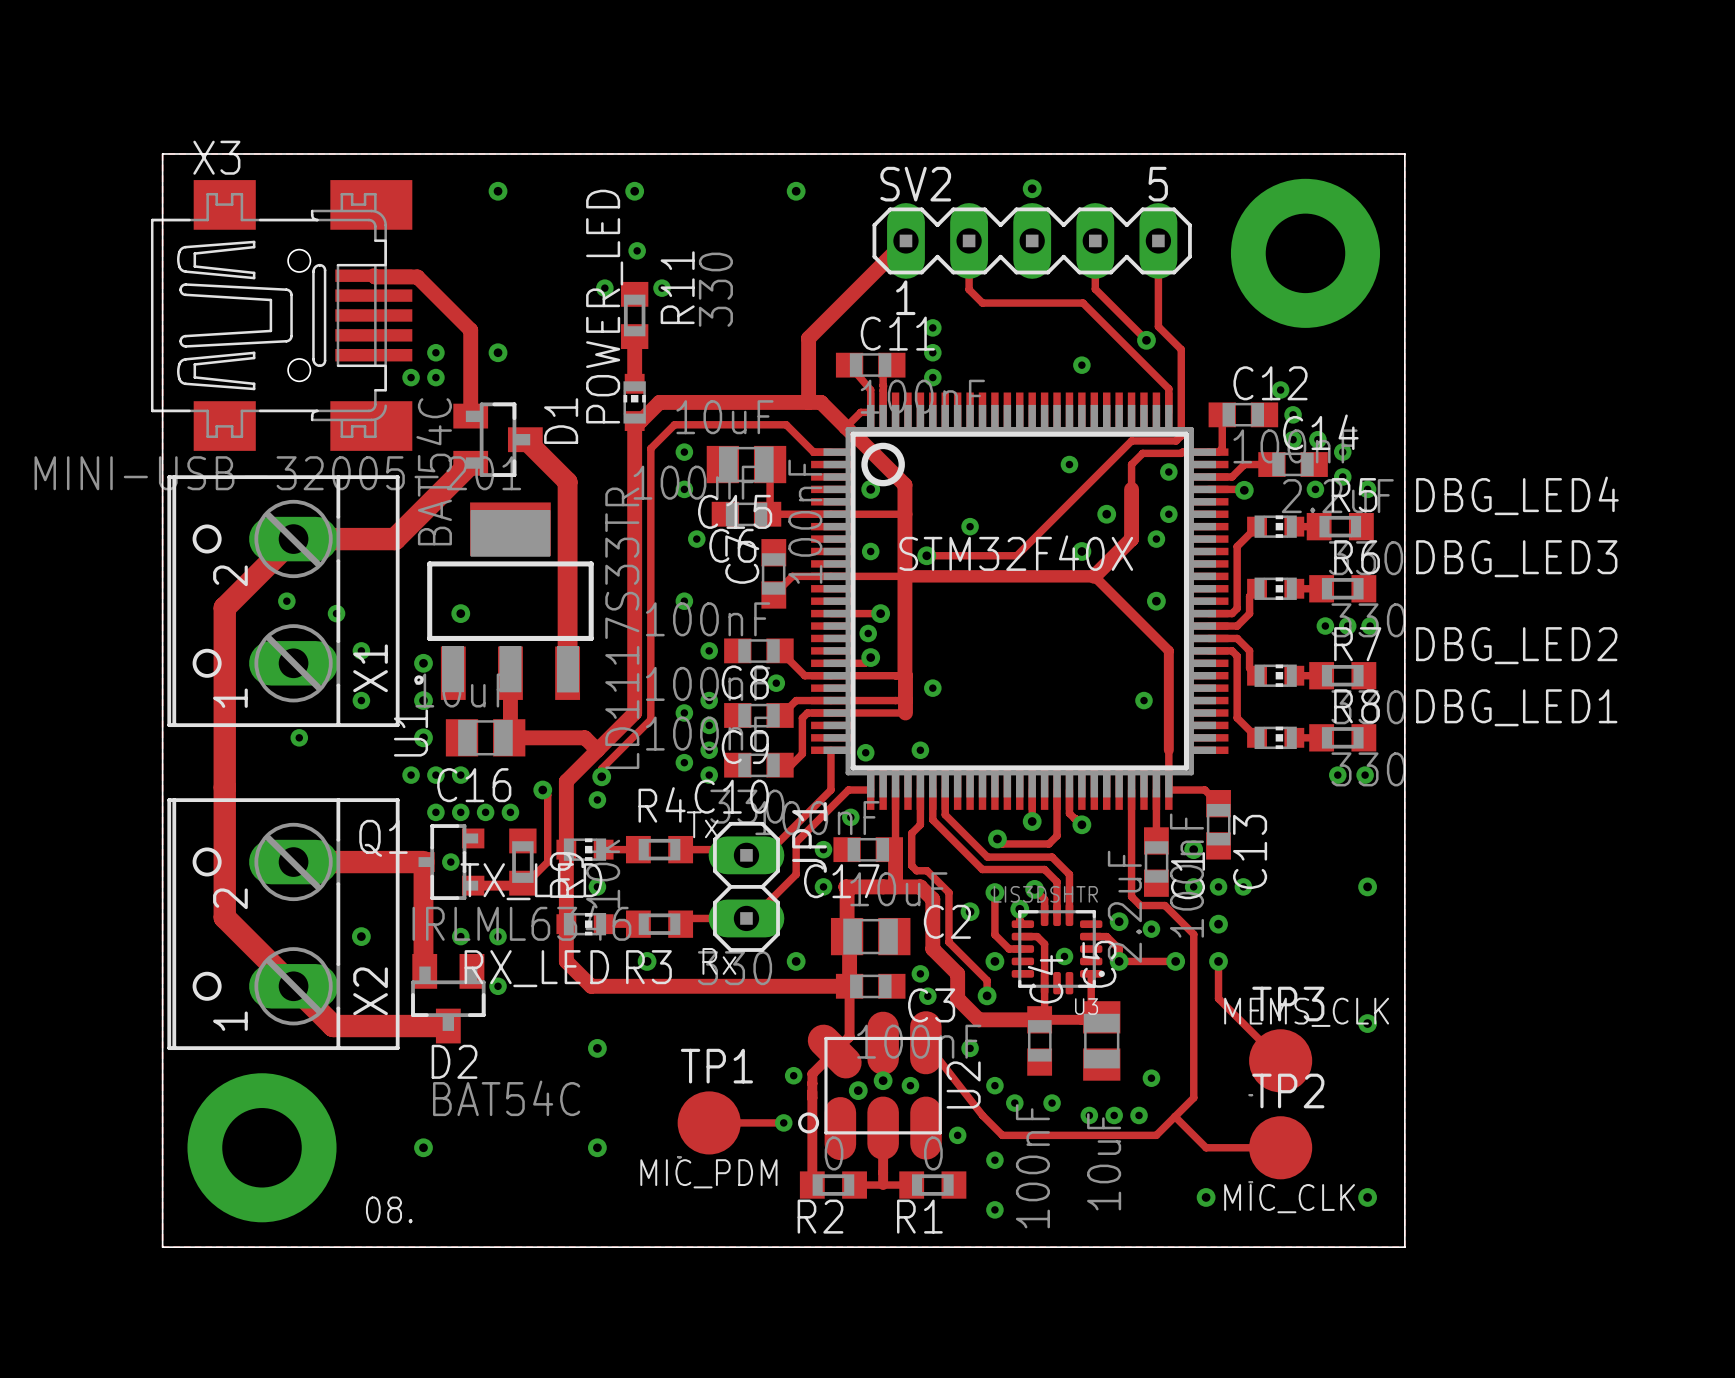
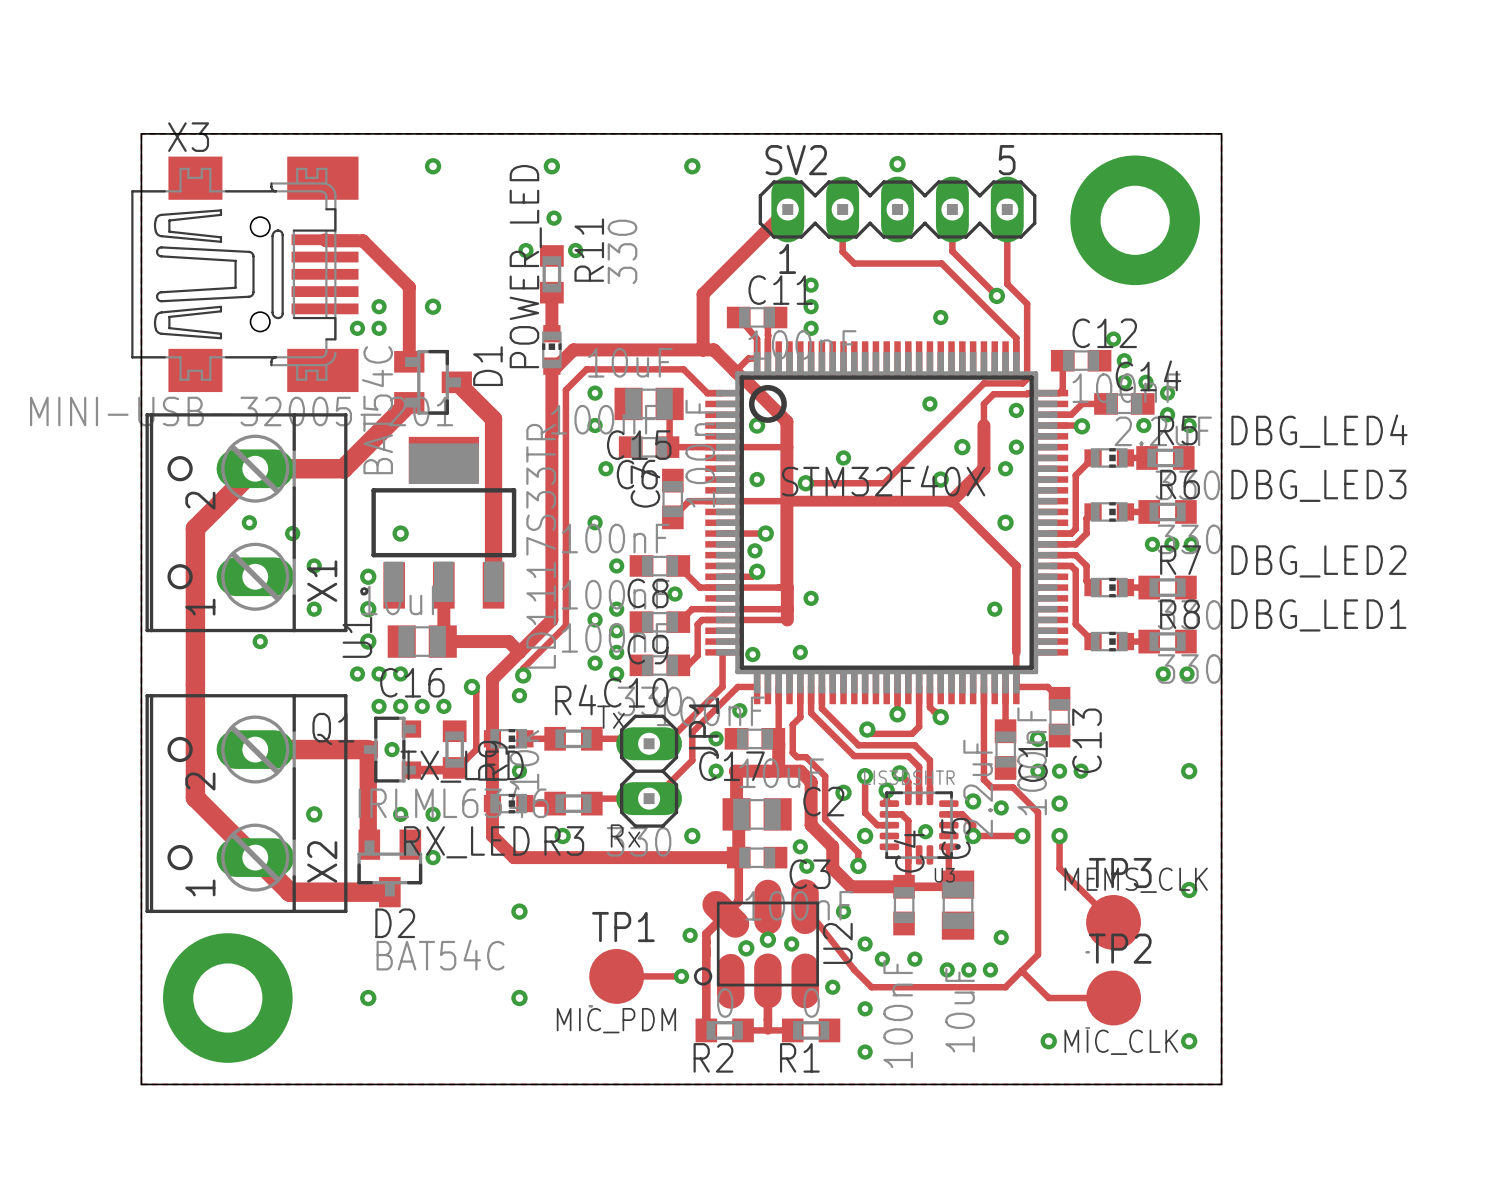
text: 08. (389, 1209) -> none

